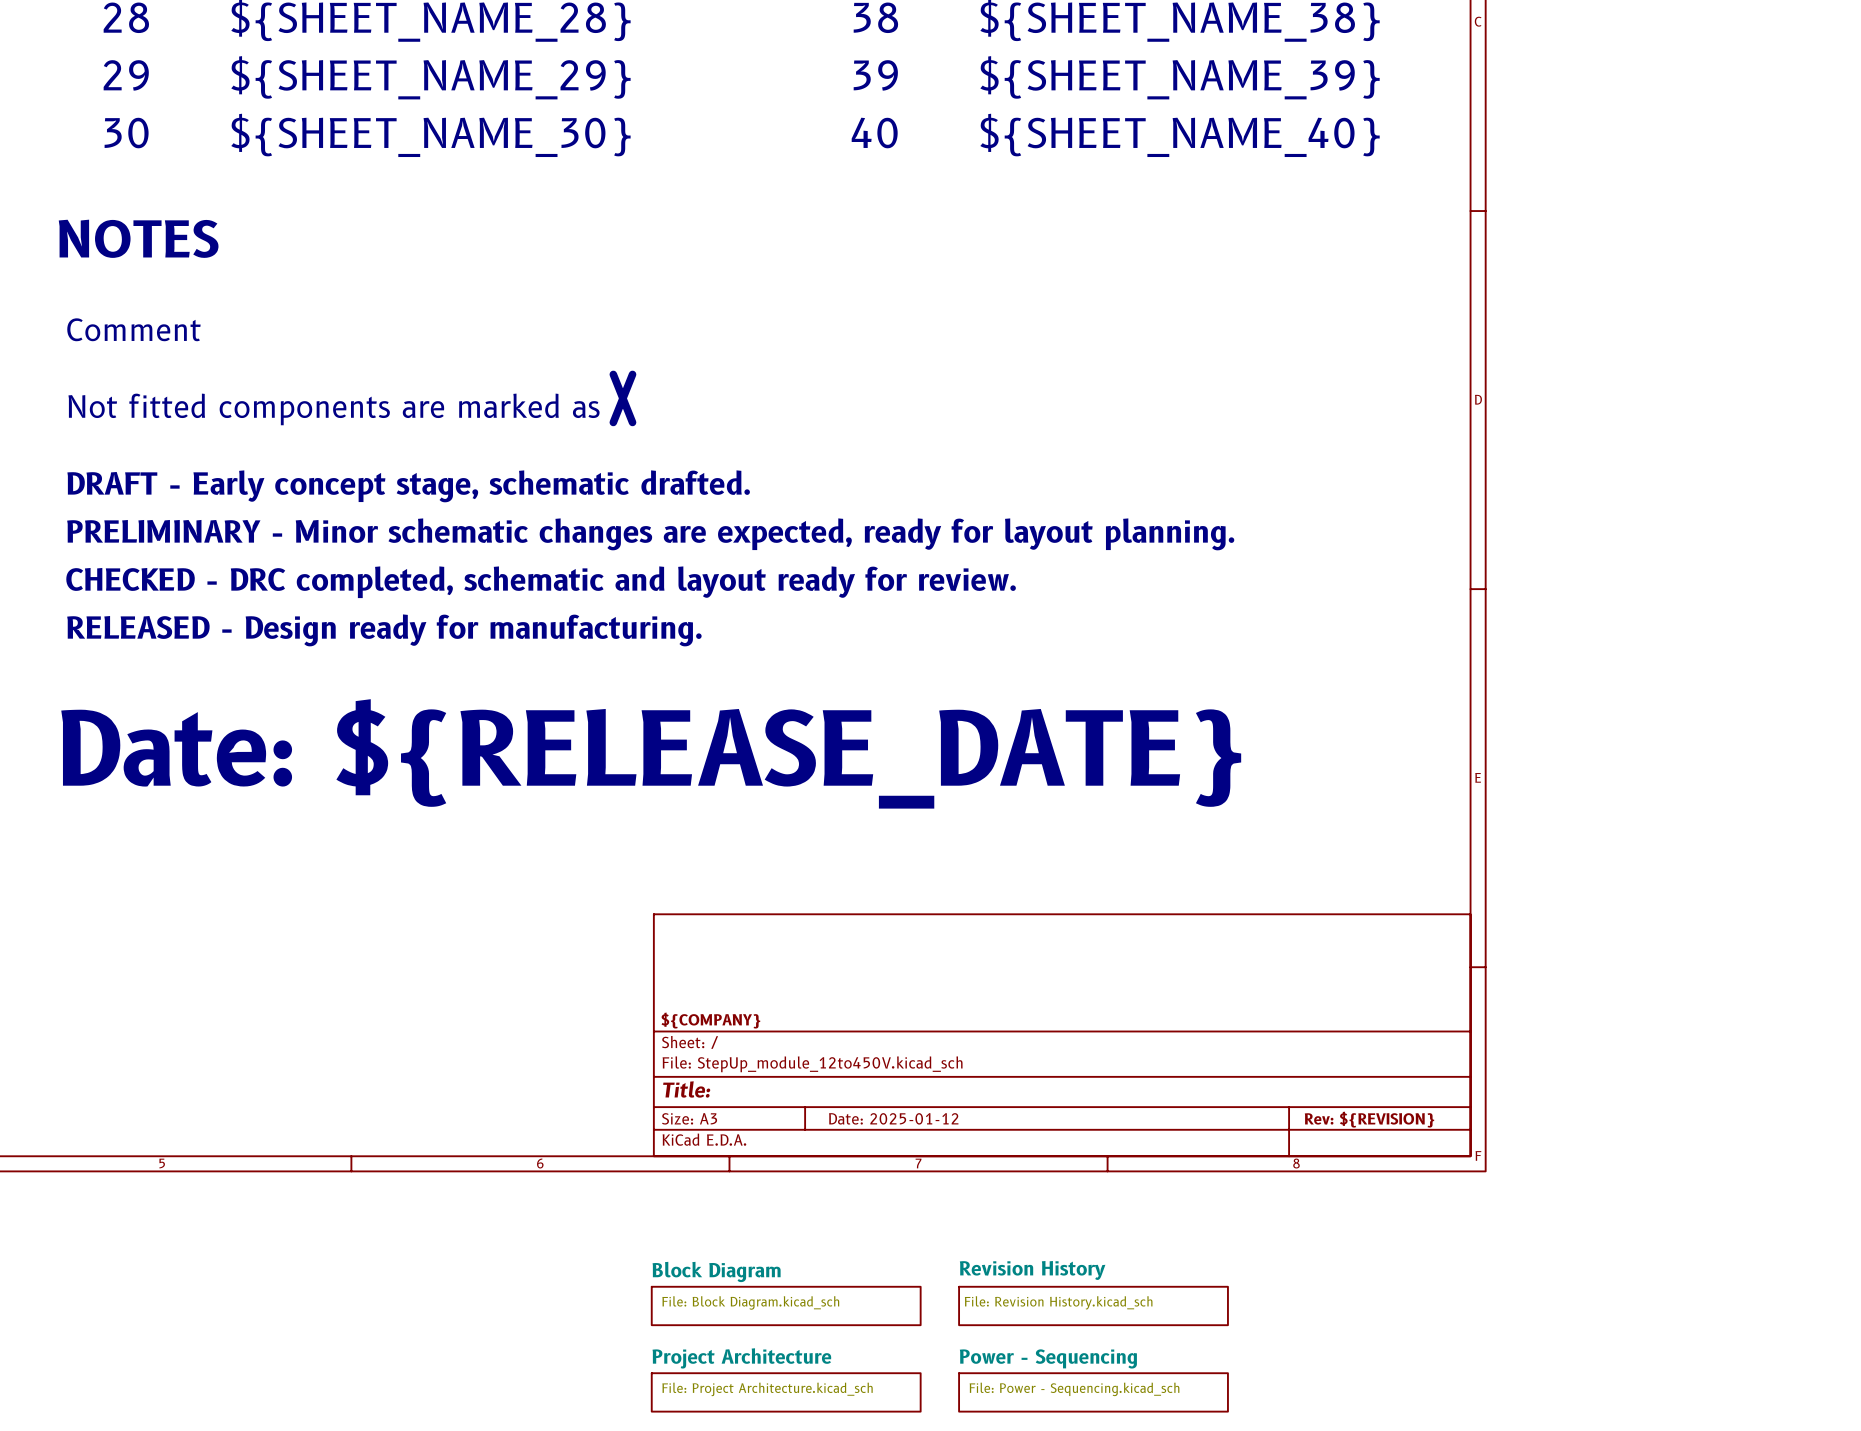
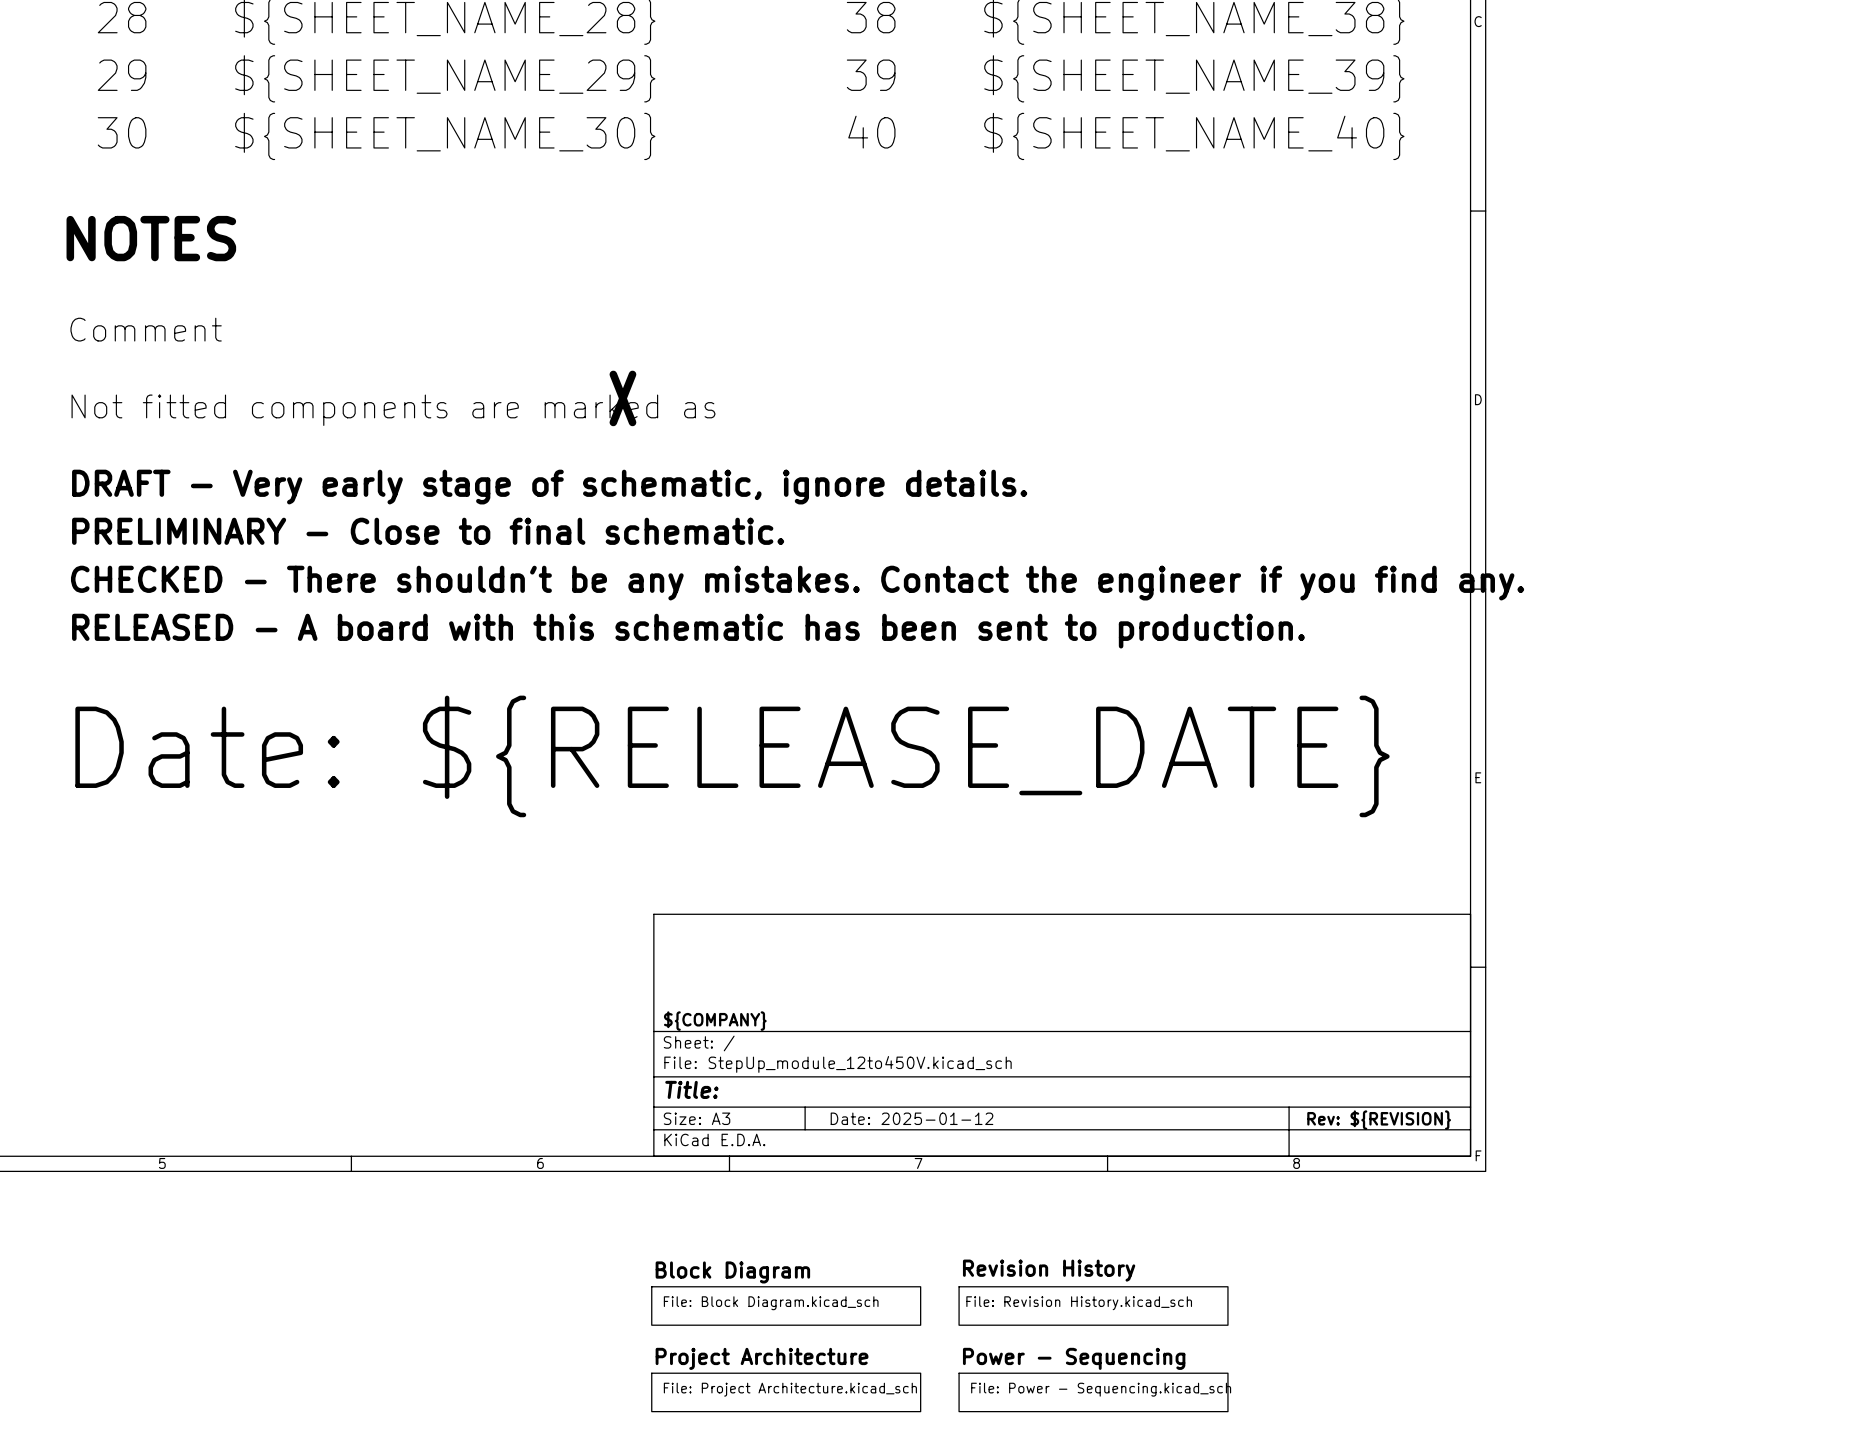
text: DRAFT - Early concept stage, schematic drafted. (408, 486) -> DRAFT - Very early stage of schematic, ignore details. (549, 487)
text: PRELIMINARY - Minor schematic changes are expected, ready for layout planning. (650, 534) -> PRELIMINARY - Close to final schematic. (428, 531)
text: CHECKED - DRC completed, schematic and layout ready for review. (541, 582) -> CHECKED - There shouldn't be any mistakes. Contact the engineer if you find any. (797, 583)
text: RELEASED - Design ready for manufacturing. (384, 630) -> RELEASED - A board with this schematic has been sent to production. (688, 631)

